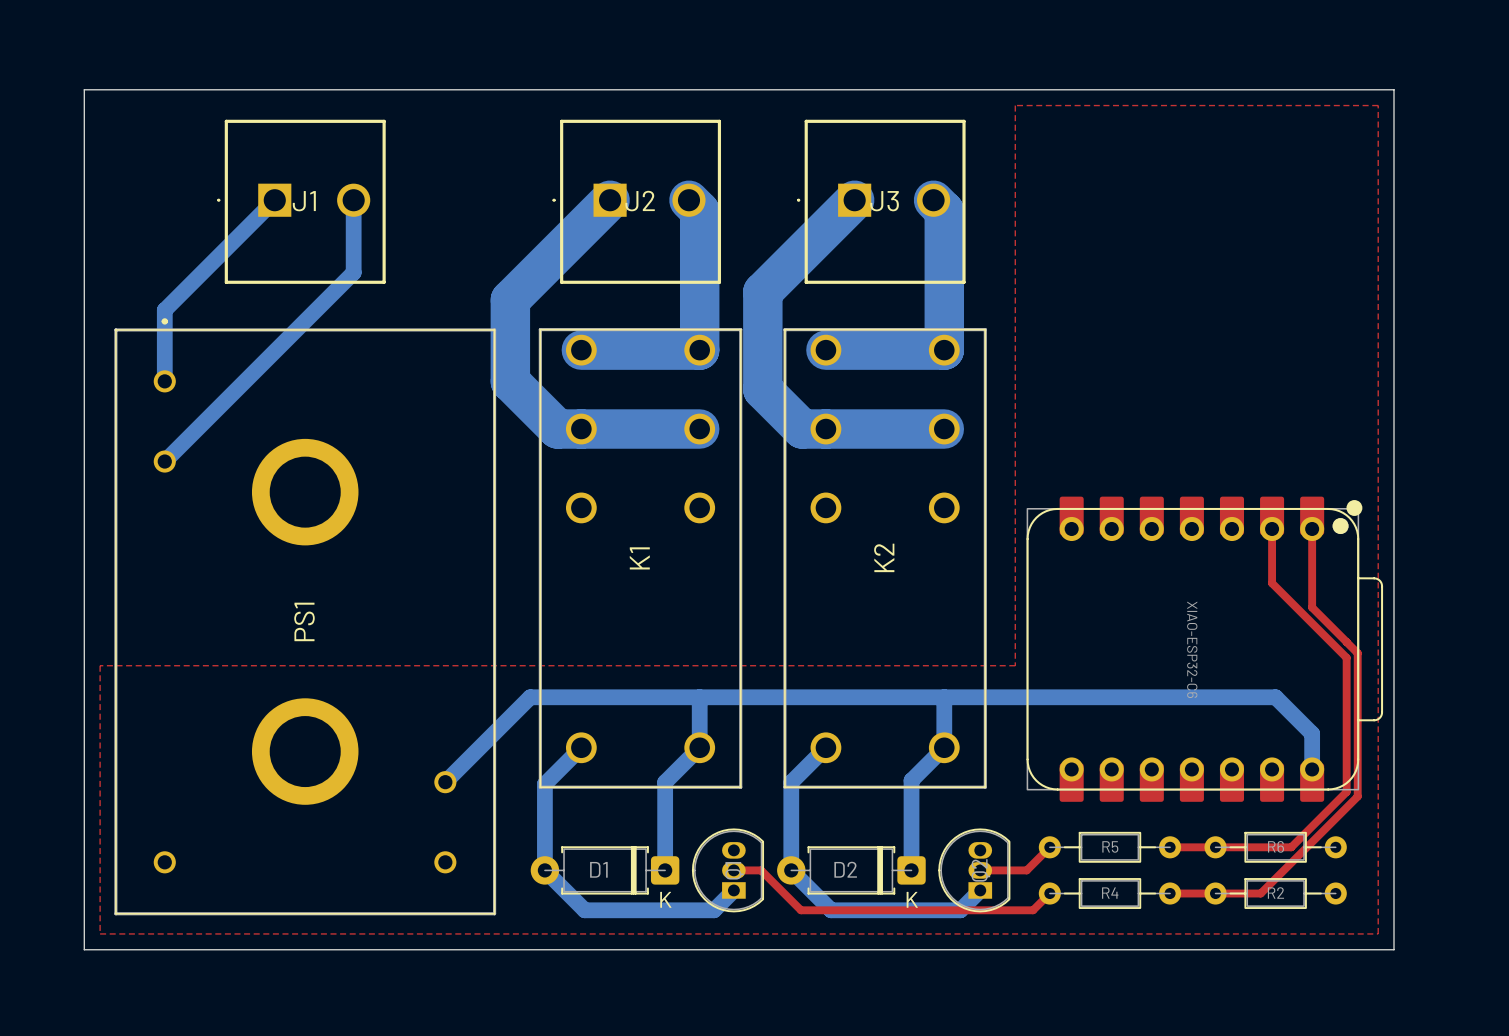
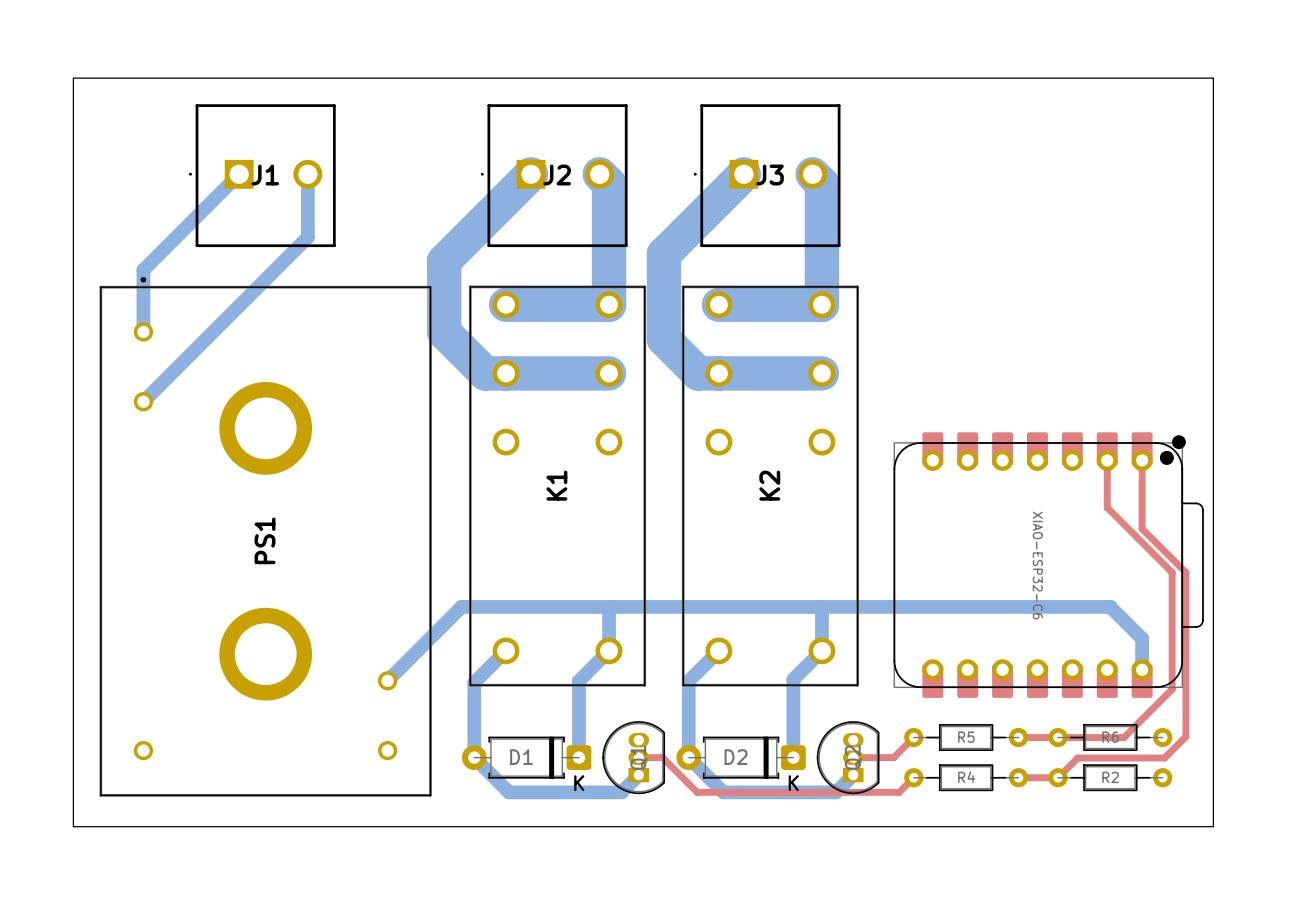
top zone outline: (1015, 105) (1378, 105) (1378, 933) (100, 933) (100, 665) (1015, 665) (1015, 105) -> none
top track: (1346, 642) (1357, 653) (1357, 796) (1260, 893) (1215, 893) -> (1172, 558) (1185, 572) (1185, 736) (1164, 758) (1077, 758) (1058, 777)

